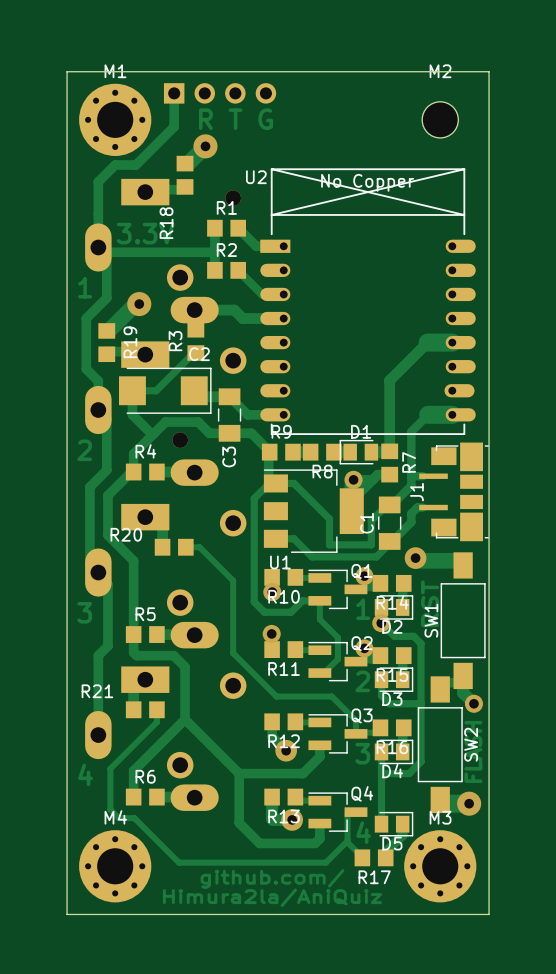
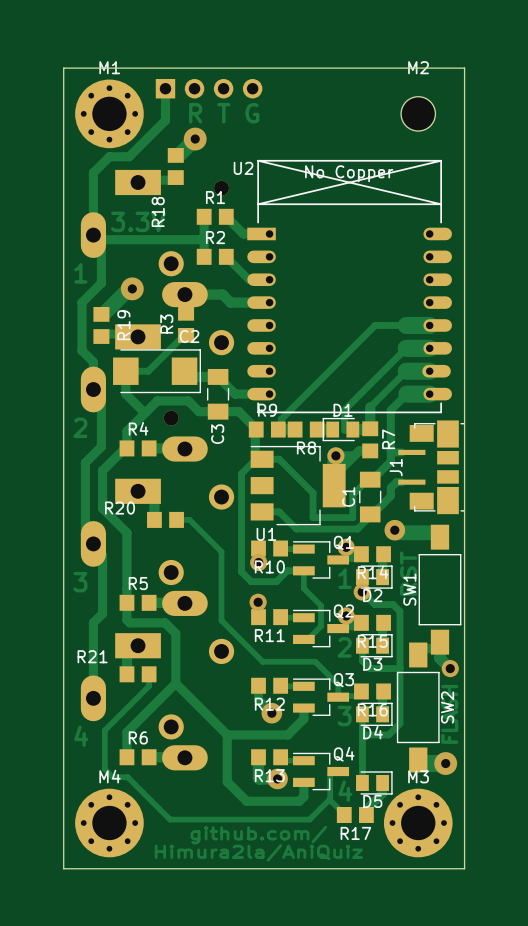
track: (427, 342) (389, 380) (389, 428) -> (429, 371) (406, 371) (370, 407)
track: none -> (406, 325) (375, 325) (281, 419) (281, 430)
track: none -> (429, 348) (406, 348) (344, 409) (344, 430)

